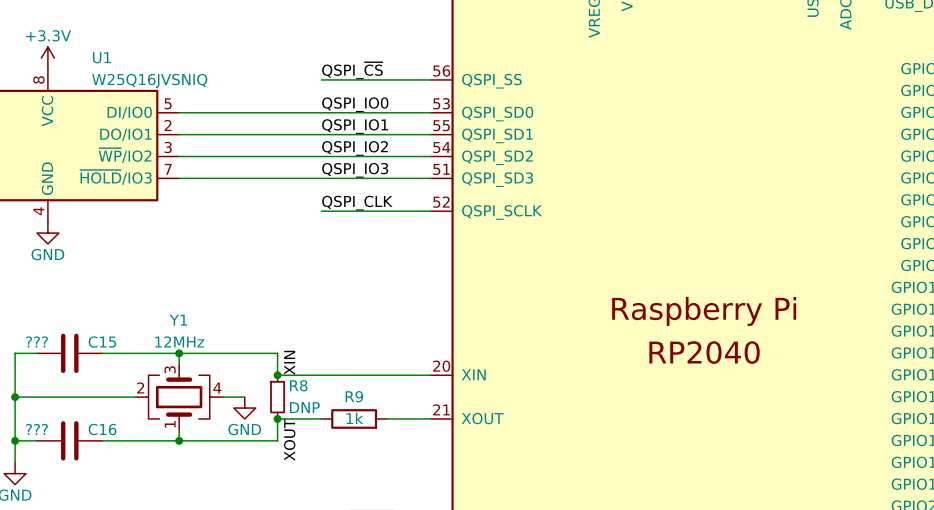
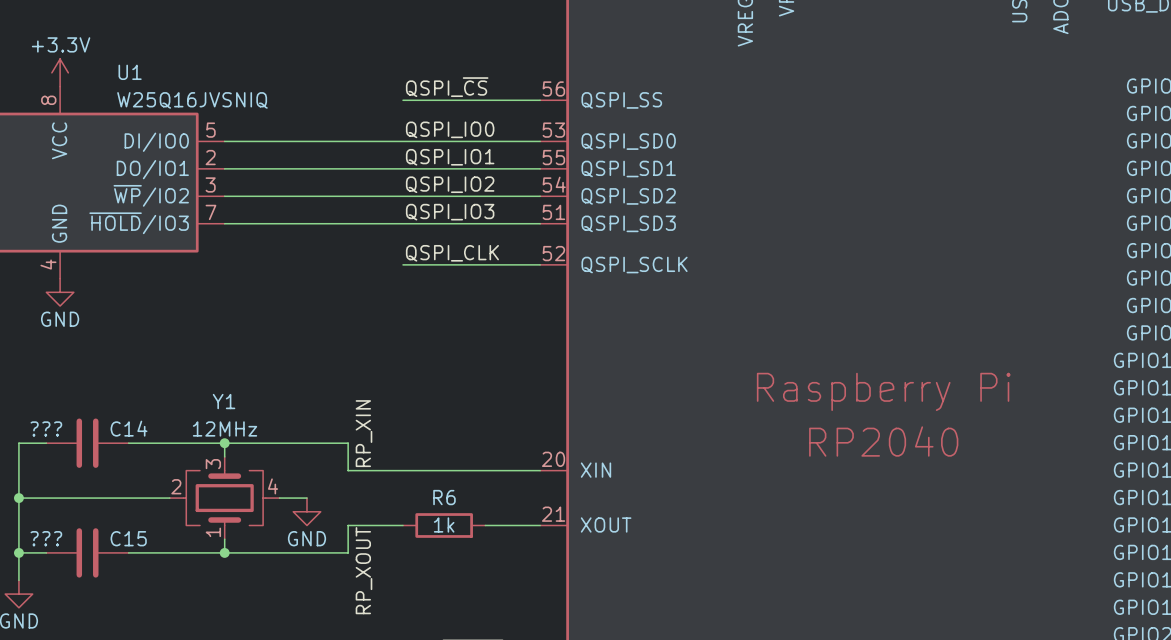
C15 name: C15 (102, 342) -> C14 (129, 428)
label: XIN (289, 362) -> RP_XIN (363, 433)
junction: (277, 375) -> none
R9 name: R9 (354, 396) -> R6 (444, 497)
R8: DNP (277, 397) -> none
junction: (277, 418) -> none
C16 name: C16 (102, 429) -> C15 (128, 538)
label: XOUT (289, 439) -> RP_XOUT (363, 570)

